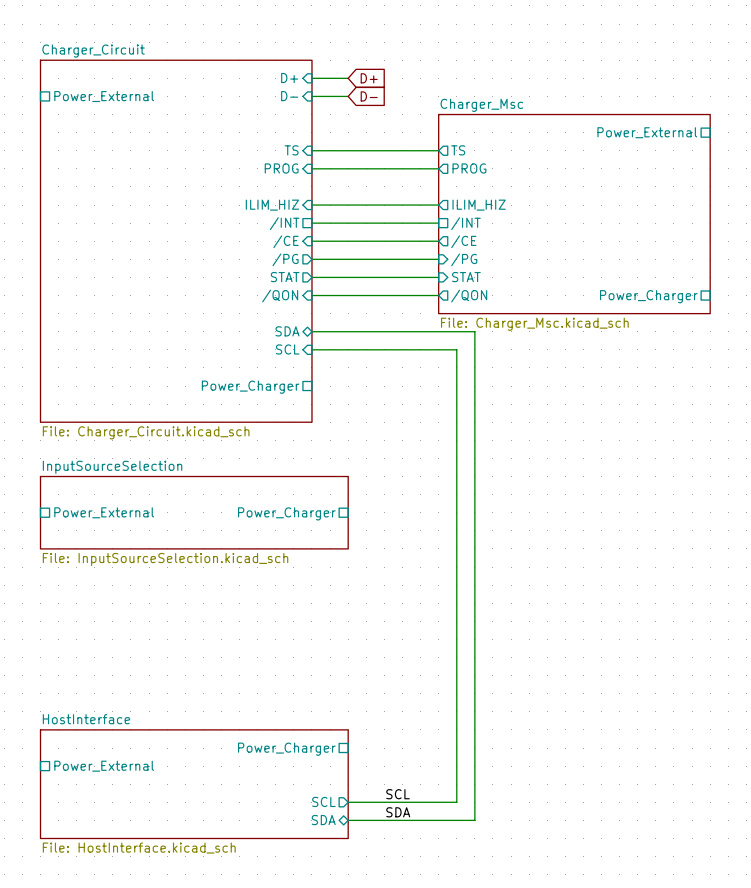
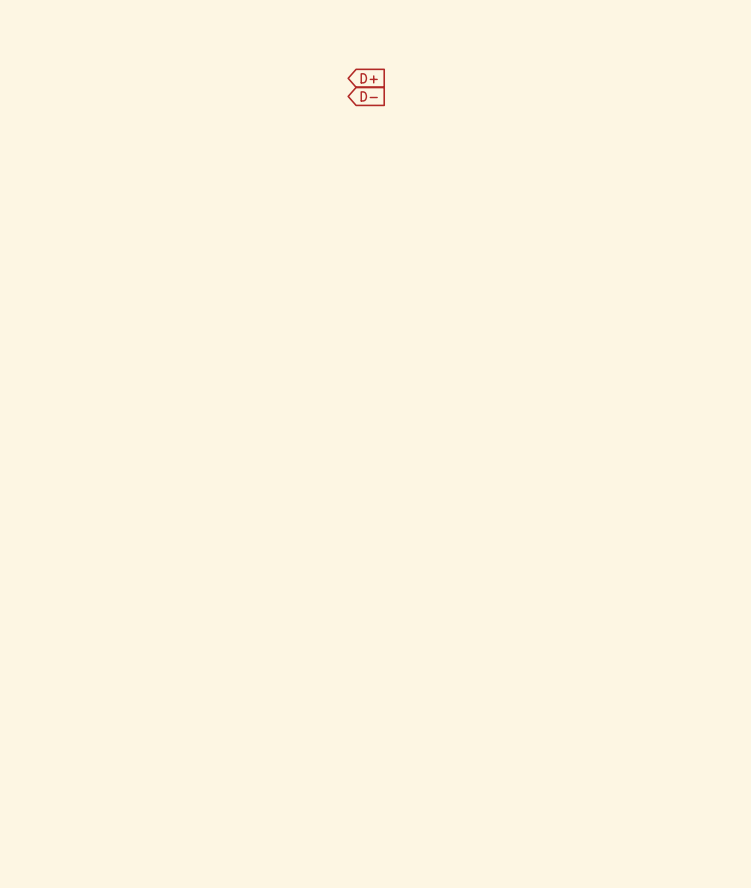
sheet pin: D+ (289, 77) -> none
wire: (311, 78) (348, 78) -> none
sheet pin: Power_External (104, 96) -> none
sheet pin: D- (289, 96) -> none
wire: (311, 96) (348, 96) -> none
sheet pin: Power_External (647, 132) -> none
sheet pin: TS (291, 150) -> none
wire: (311, 150) (438, 150) -> none
sheet pin: TS (458, 150) -> none
sheet pin: PROG (281, 168) -> none
wire: (311, 168) (438, 168) -> none
sheet pin: PROG (469, 168) -> none
sheet pin: ILIM_HIZ (272, 205) -> none
wire: (311, 205) (438, 205) -> none
sheet pin: ILIM_HIZ (479, 205) -> none
sheet Charger_Msc: File: Charger_Msc.kicad_sch (574, 214) -> none
sheet pin: /INT (284, 223) -> none
wire: (311, 223) (438, 223) -> none
sheet pin: /INT (465, 223) -> none
sheet Charger_Circuit: File: Charger_Circuit.kicad_sch (176, 241) -> none
sheet pin: /CE (285, 241) -> none
wire: (311, 241) (438, 241) -> none
sheet pin: /CE (463, 241) -> none
sheet pin: /PG (285, 259) -> none
wire: (311, 259) (438, 259) -> none
sheet pin: /PG (464, 259) -> none
sheet pin: STAT (285, 277) -> none
wire: (311, 277) (438, 277) -> none
sheet pin: STAT (466, 277) -> none
wire: (311, 295) (438, 295) -> none
sheet pin: /QON (280, 296) -> none
sheet pin: /QON (469, 296) -> none
sheet pin: Power_Charger (648, 296) -> none
sheet pin: SDA (287, 331) -> none
wire: (311, 331) (474, 331) (474, 820) (348, 820) -> none
sheet pin: SCL (287, 349) -> none
wire: (311, 349) (456, 349) (456, 802) (348, 802) -> none
sheet pin: Power_Charger (250, 387) -> none
sheet pin: Power_External (104, 512) -> none
sheet InputSourceSelection: File: InputSourceSelection.kicad_sch (194, 512) -> none
sheet pin: Power_Charger (286, 513) -> none
sheet pin: Power_Charger (286, 749) -> none
sheet pin: Power_External (104, 766) -> none
sheet HostInterface: File: HostInterface.kicad_sch (194, 784) -> none
label: SCL (398, 794) -> none
sheet pin: SCL (323, 801) -> none
label: SDA (398, 812) -> none
sheet pin: SDA (323, 820) -> none

